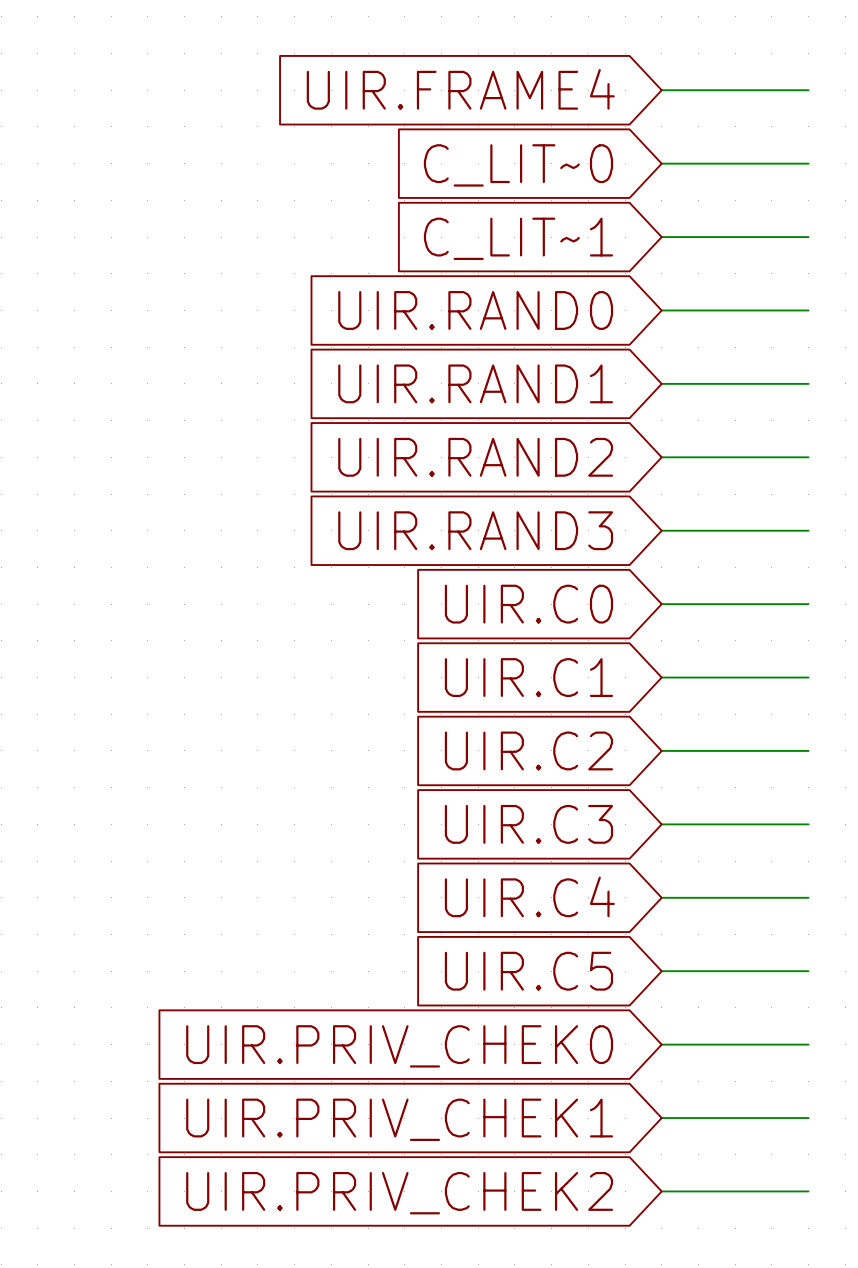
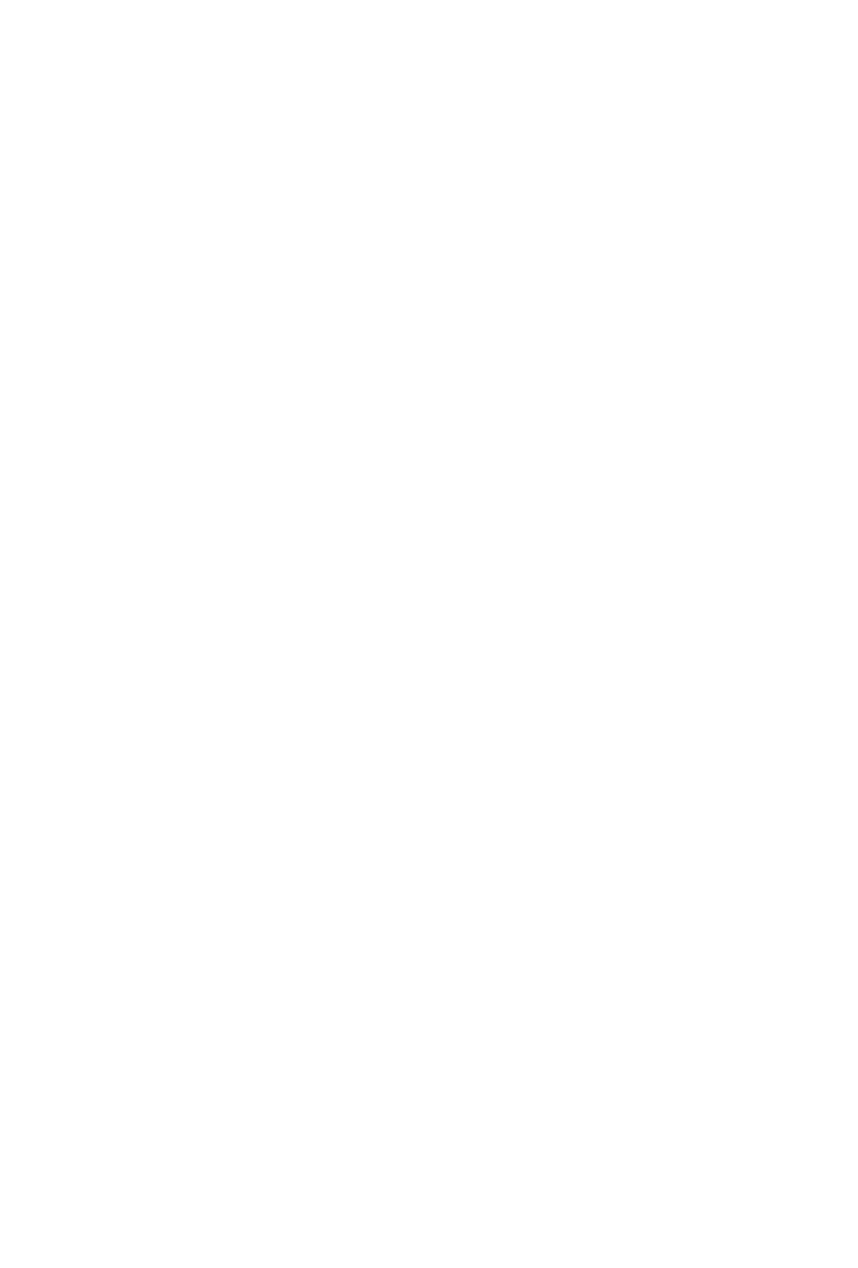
global label: UIR.FRAME4 (460, 89) -> none
wire: (661, 90) (808, 90) -> none
wire: (661, 163) (808, 163) -> none
global label: C_LIT~0 (518, 165) -> none
wire: (661, 237) (808, 237) -> none
global label: C_LIT~1 (518, 238) -> none
global label: UIR.RAND0 (475, 310) -> none
wire: (661, 310) (808, 310) -> none
global label: UIR.RAND1 (475, 383) -> none
wire: (661, 383) (808, 383) -> none
global label: UIR.RAND2 (475, 457) -> none
wire: (661, 457) (808, 457) -> none
global label: UIR.RAND3 (475, 530) -> none
wire: (661, 530) (808, 530) -> none
global label: UIR.C0 (528, 604) -> none
wire: (661, 604) (808, 604) -> none
global label: UIR.C1 (528, 677) -> none
wire: (661, 677) (808, 677) -> none
global label: UIR.C2 (528, 750) -> none
wire: (661, 750) (808, 750) -> none
global label: UIR.C3 (528, 824) -> none
wire: (661, 824) (808, 824) -> none
global label: UIR.C4 (529, 896) -> none
wire: (661, 897) (808, 897) -> none
global label: UIR.C5 (528, 971) -> none
wire: (661, 971) (808, 971) -> none
wire: (661, 1044) (808, 1044) -> none
global label: UIR.PRIV_CHEK0 (399, 1046) -> none
wire: (661, 1118) (808, 1118) -> none
global label: UIR.PRIV_CHEK1 (399, 1119) -> none
wire: (661, 1191) (808, 1191) -> none
global label: UIR.PRIV_CHEK2 (399, 1193) -> none

